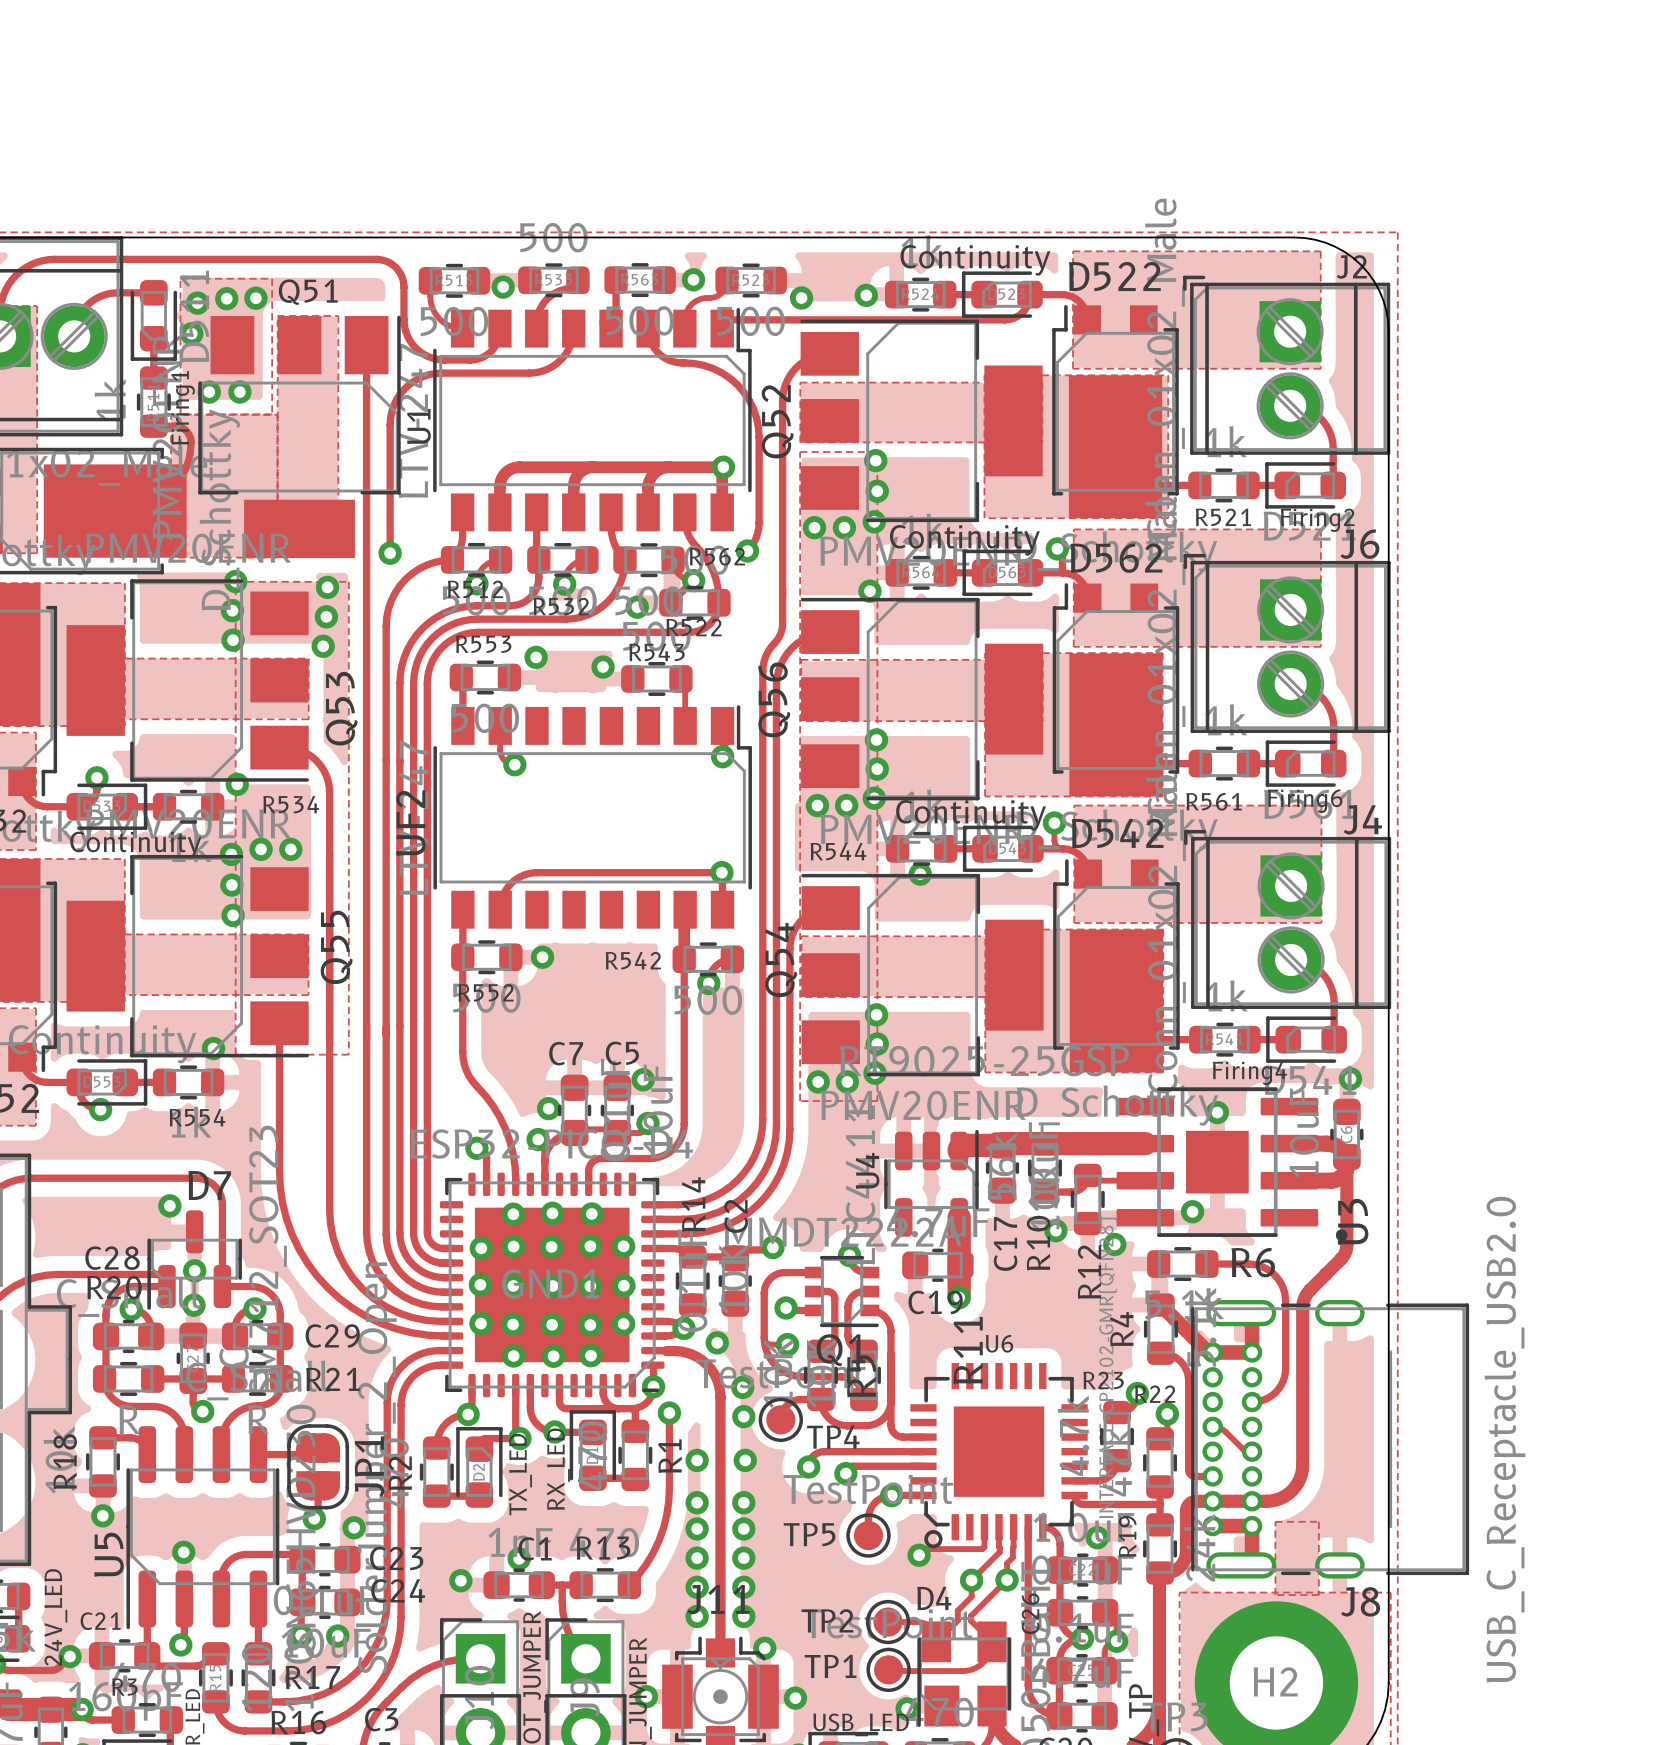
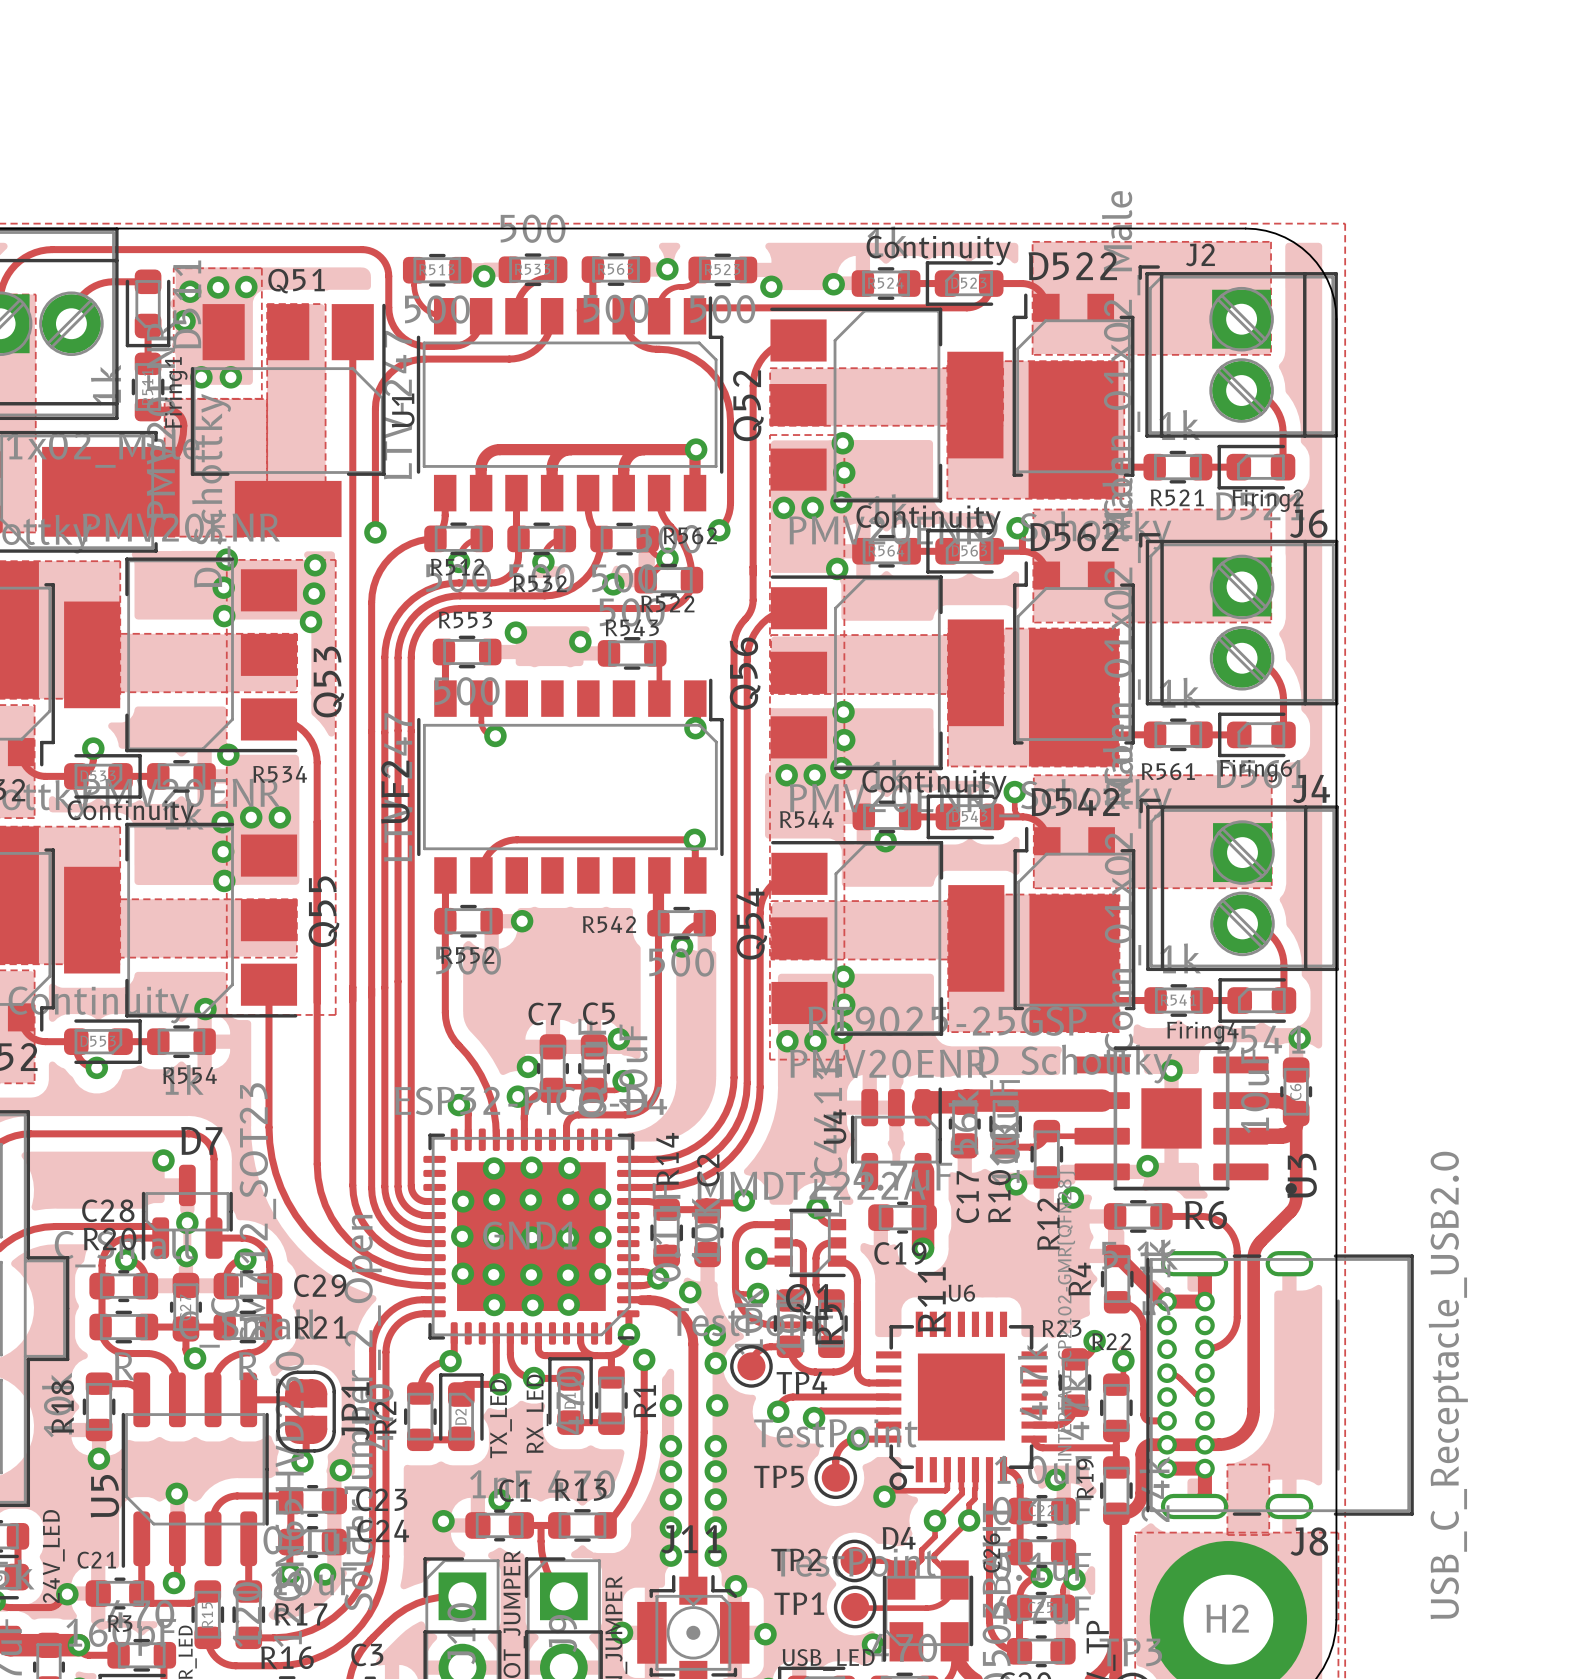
J2 name position: J2 (1351, 266) -> J2 (1200, 254)

